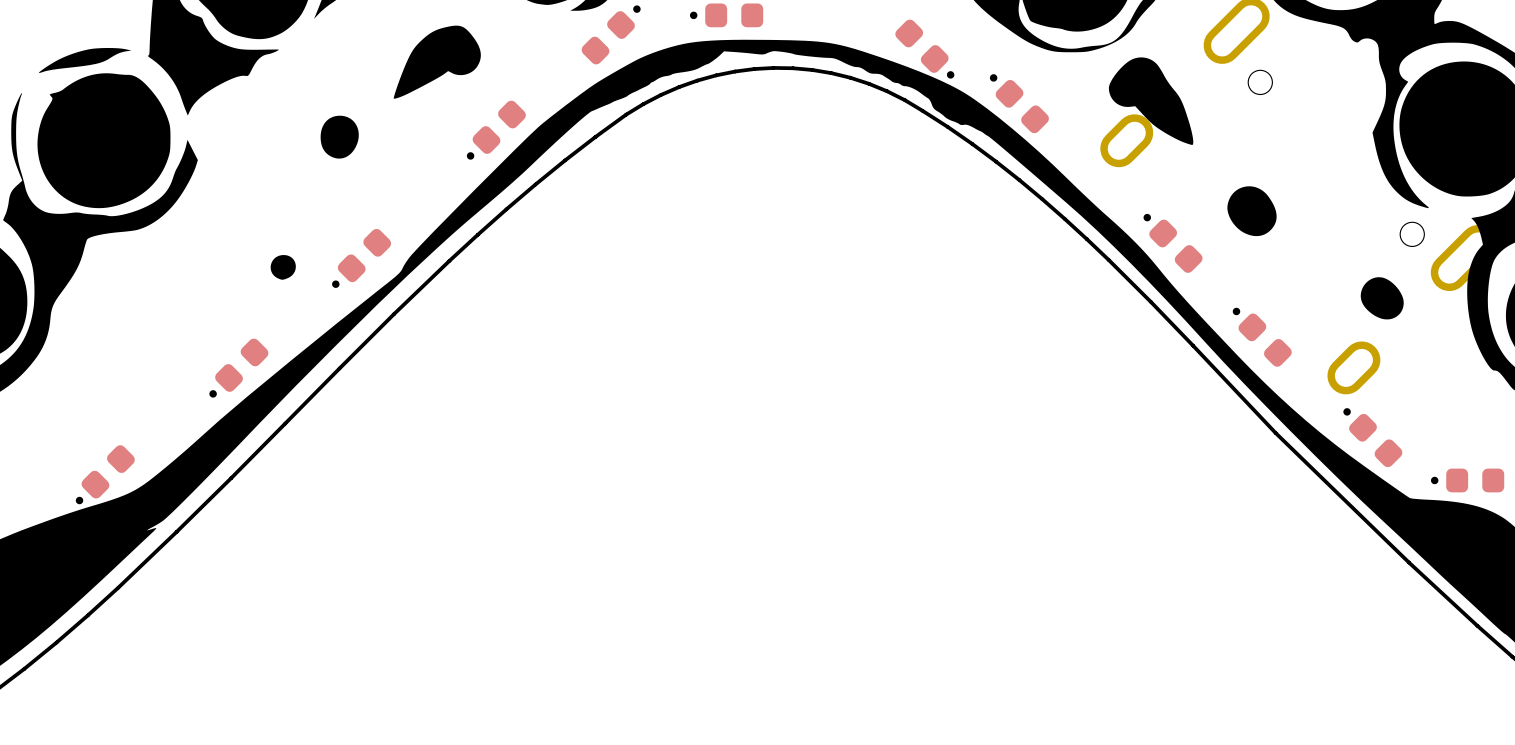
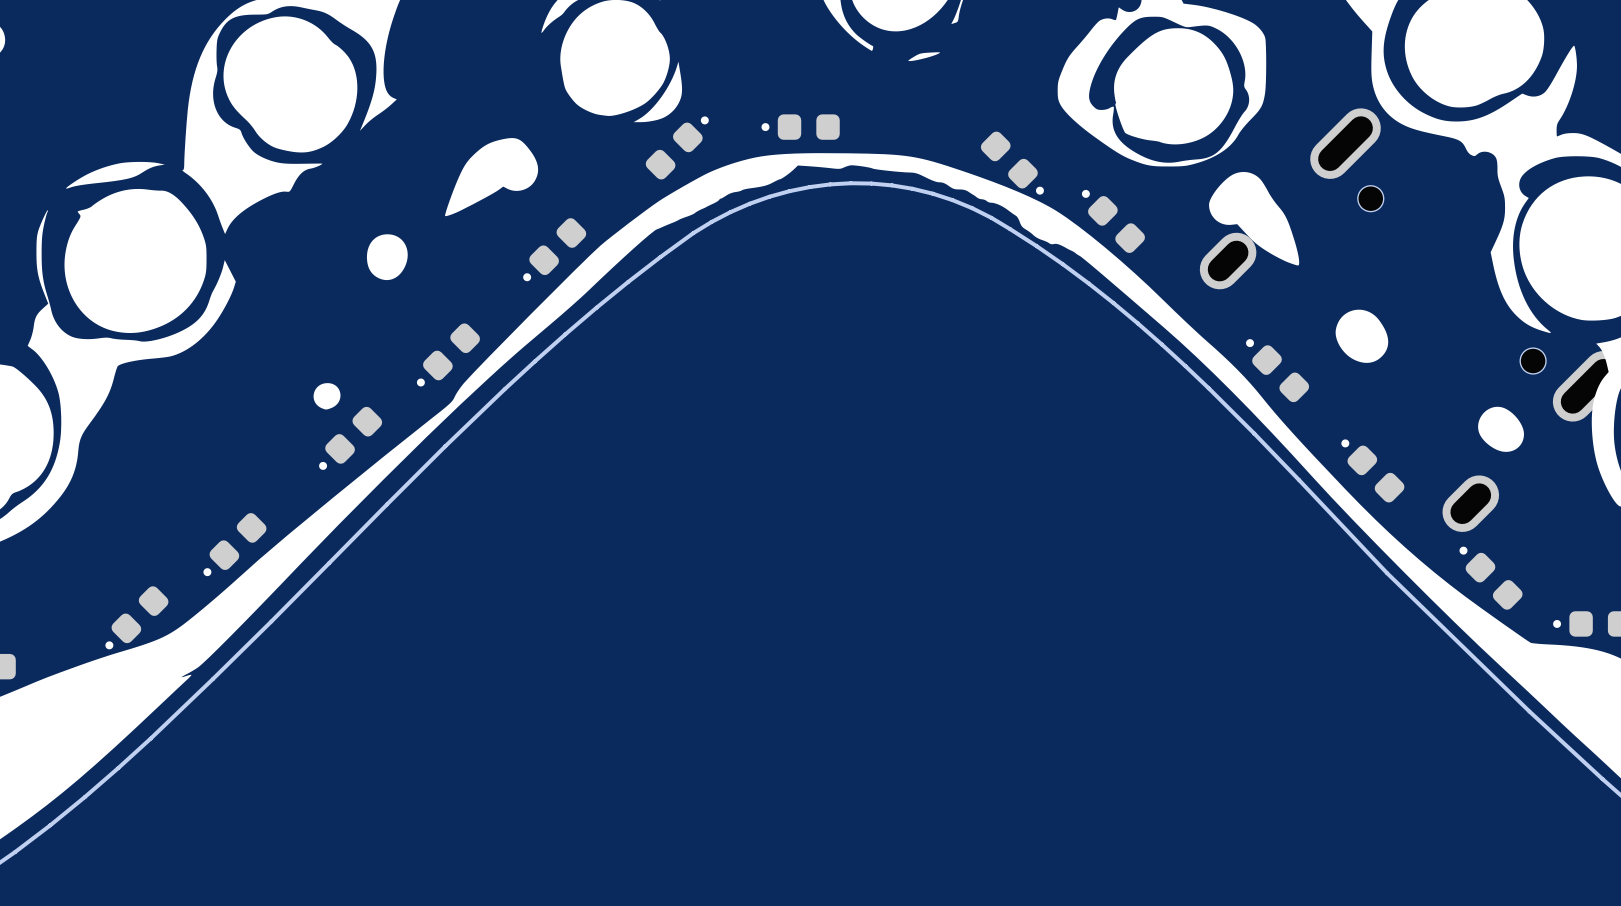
part: none -> (448, 354)
part: (361, 258) -> none
part: none -> (350, 438)
part: (238, 368) -> none
part: none -> (234, 544)

